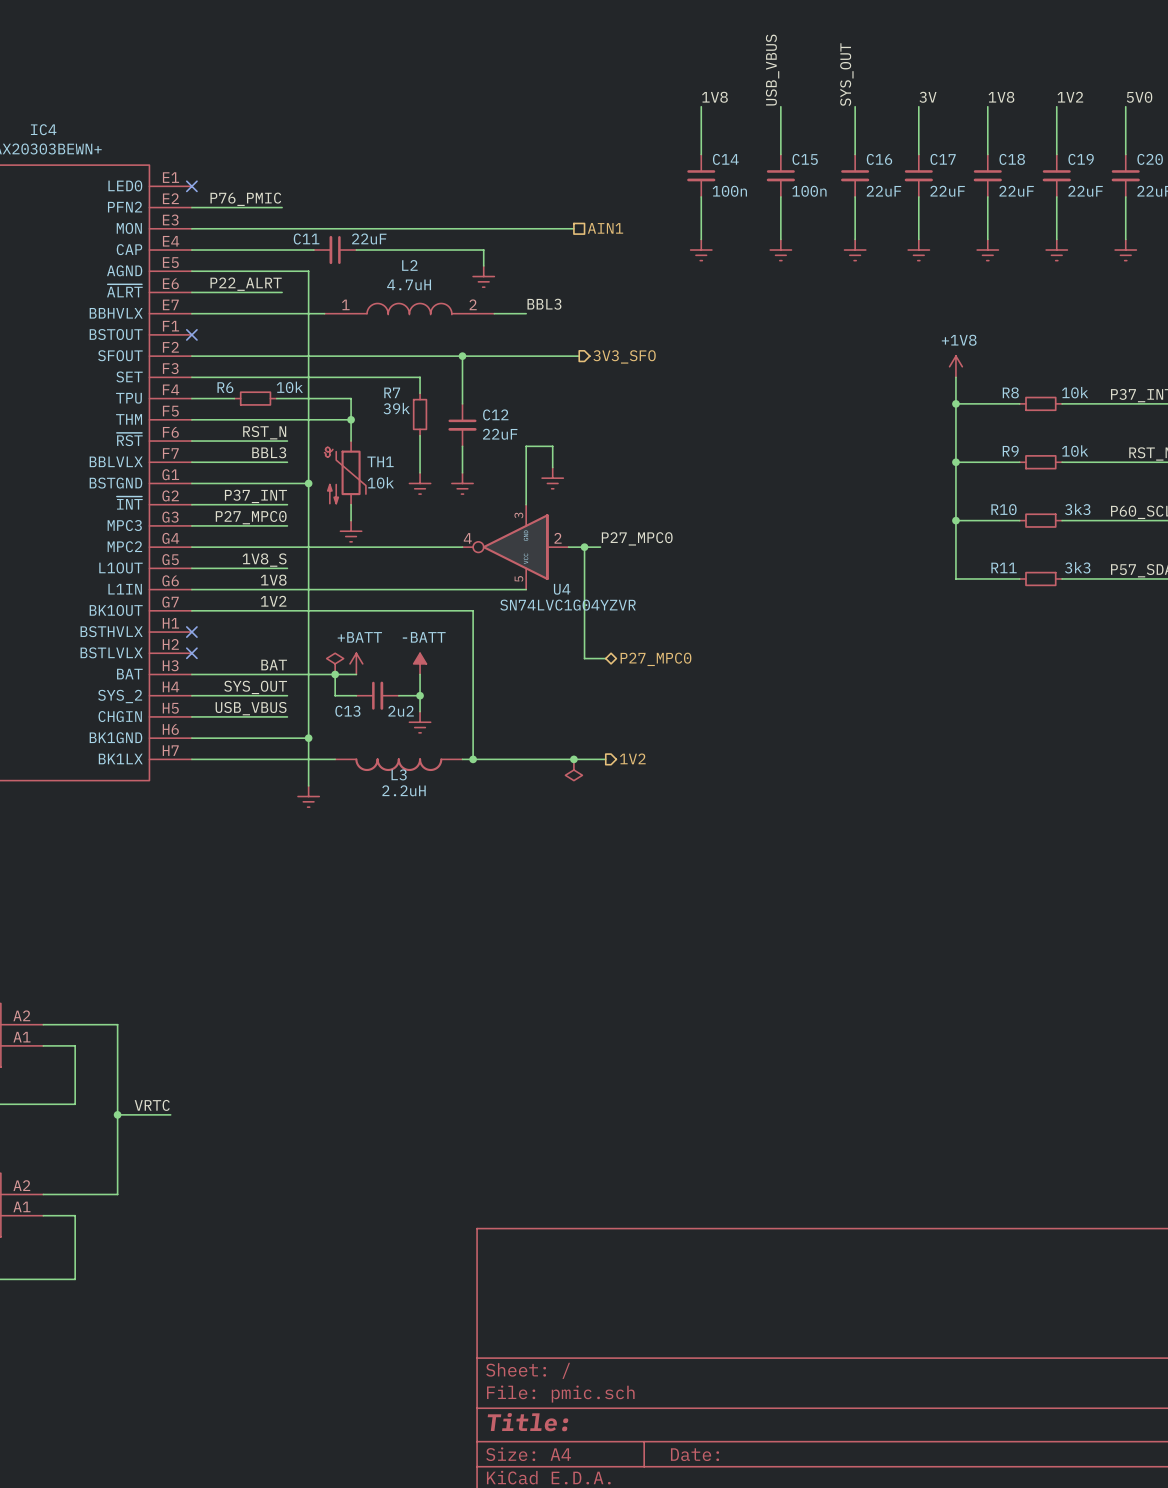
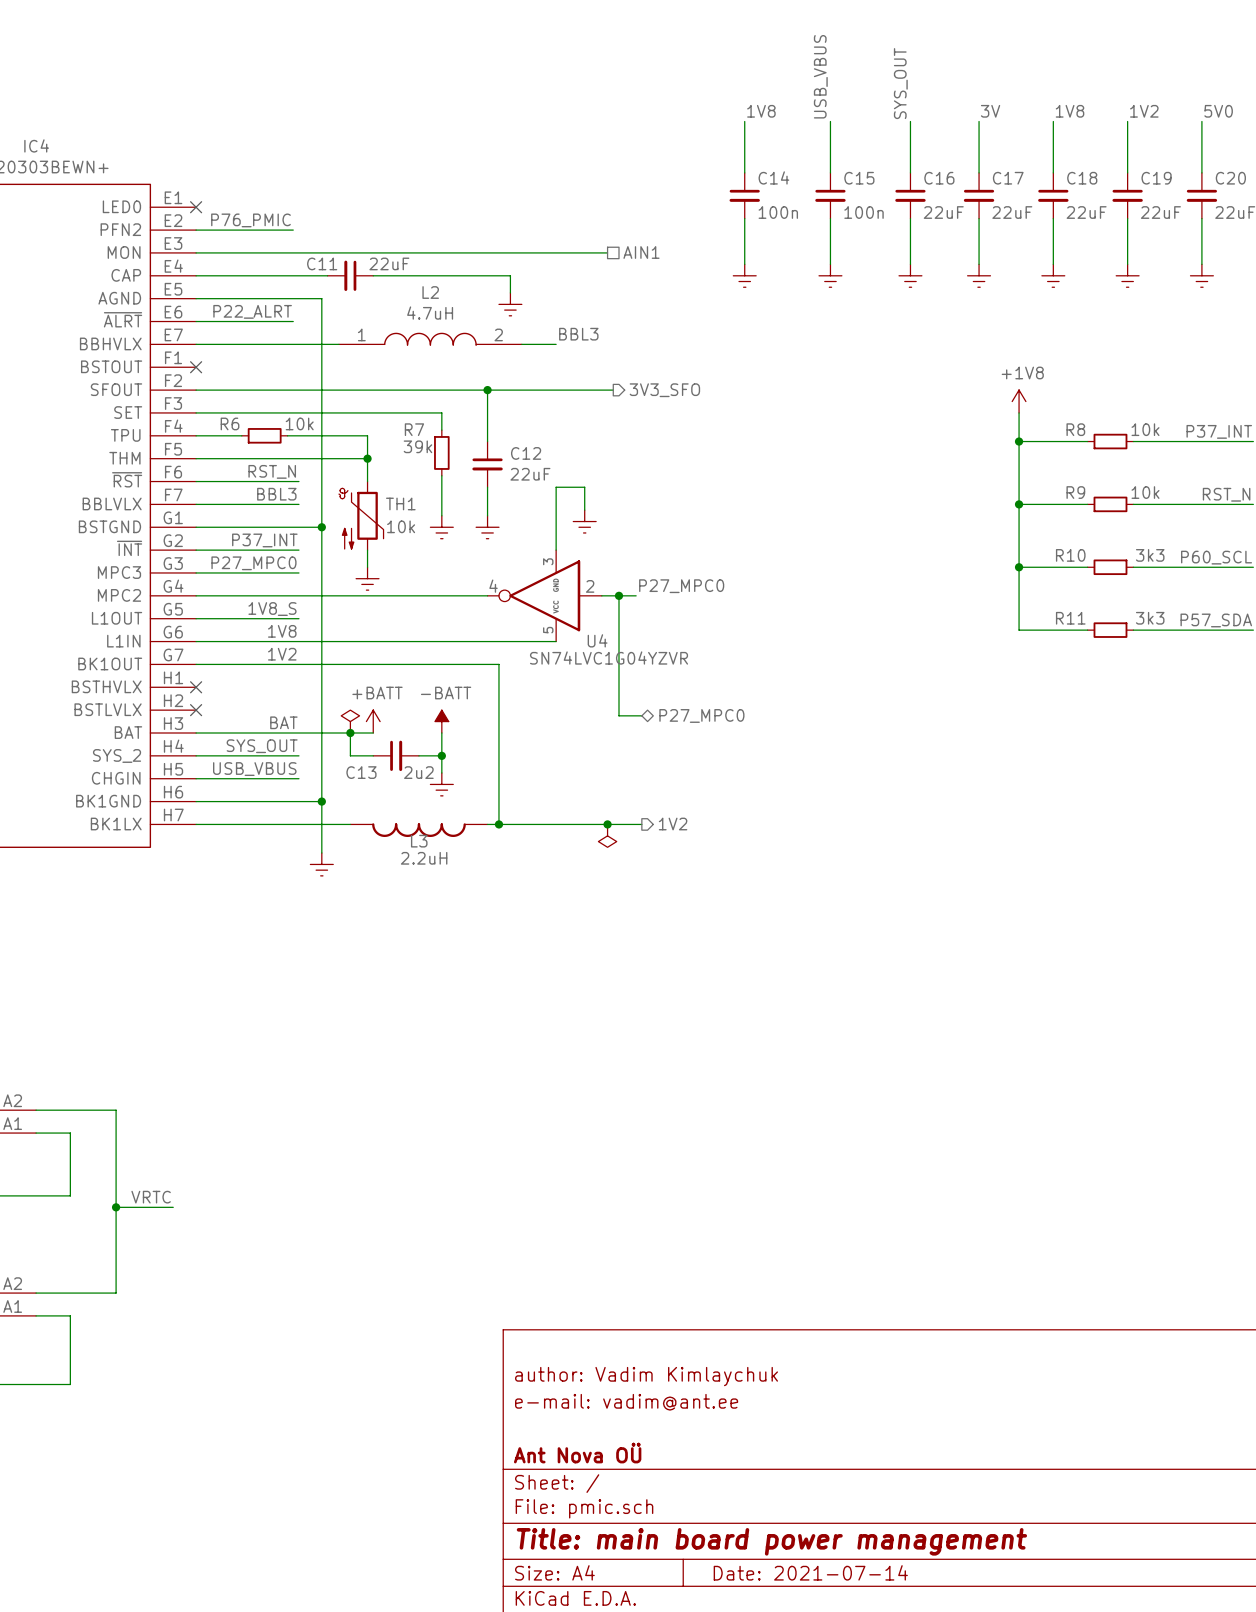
title block: none -> author: Vadim Kimlaychuk (646, 1376)
title block: none -> e-mail: vadim@ant.ee (626, 1402)
title block: none -> Ant Nova OÜ (577, 1453)
title block: Title: (528, 1422) -> Title: main board power management (771, 1541)
title block: Date: (695, 1454) -> Date: 2021-07-14 (810, 1572)

